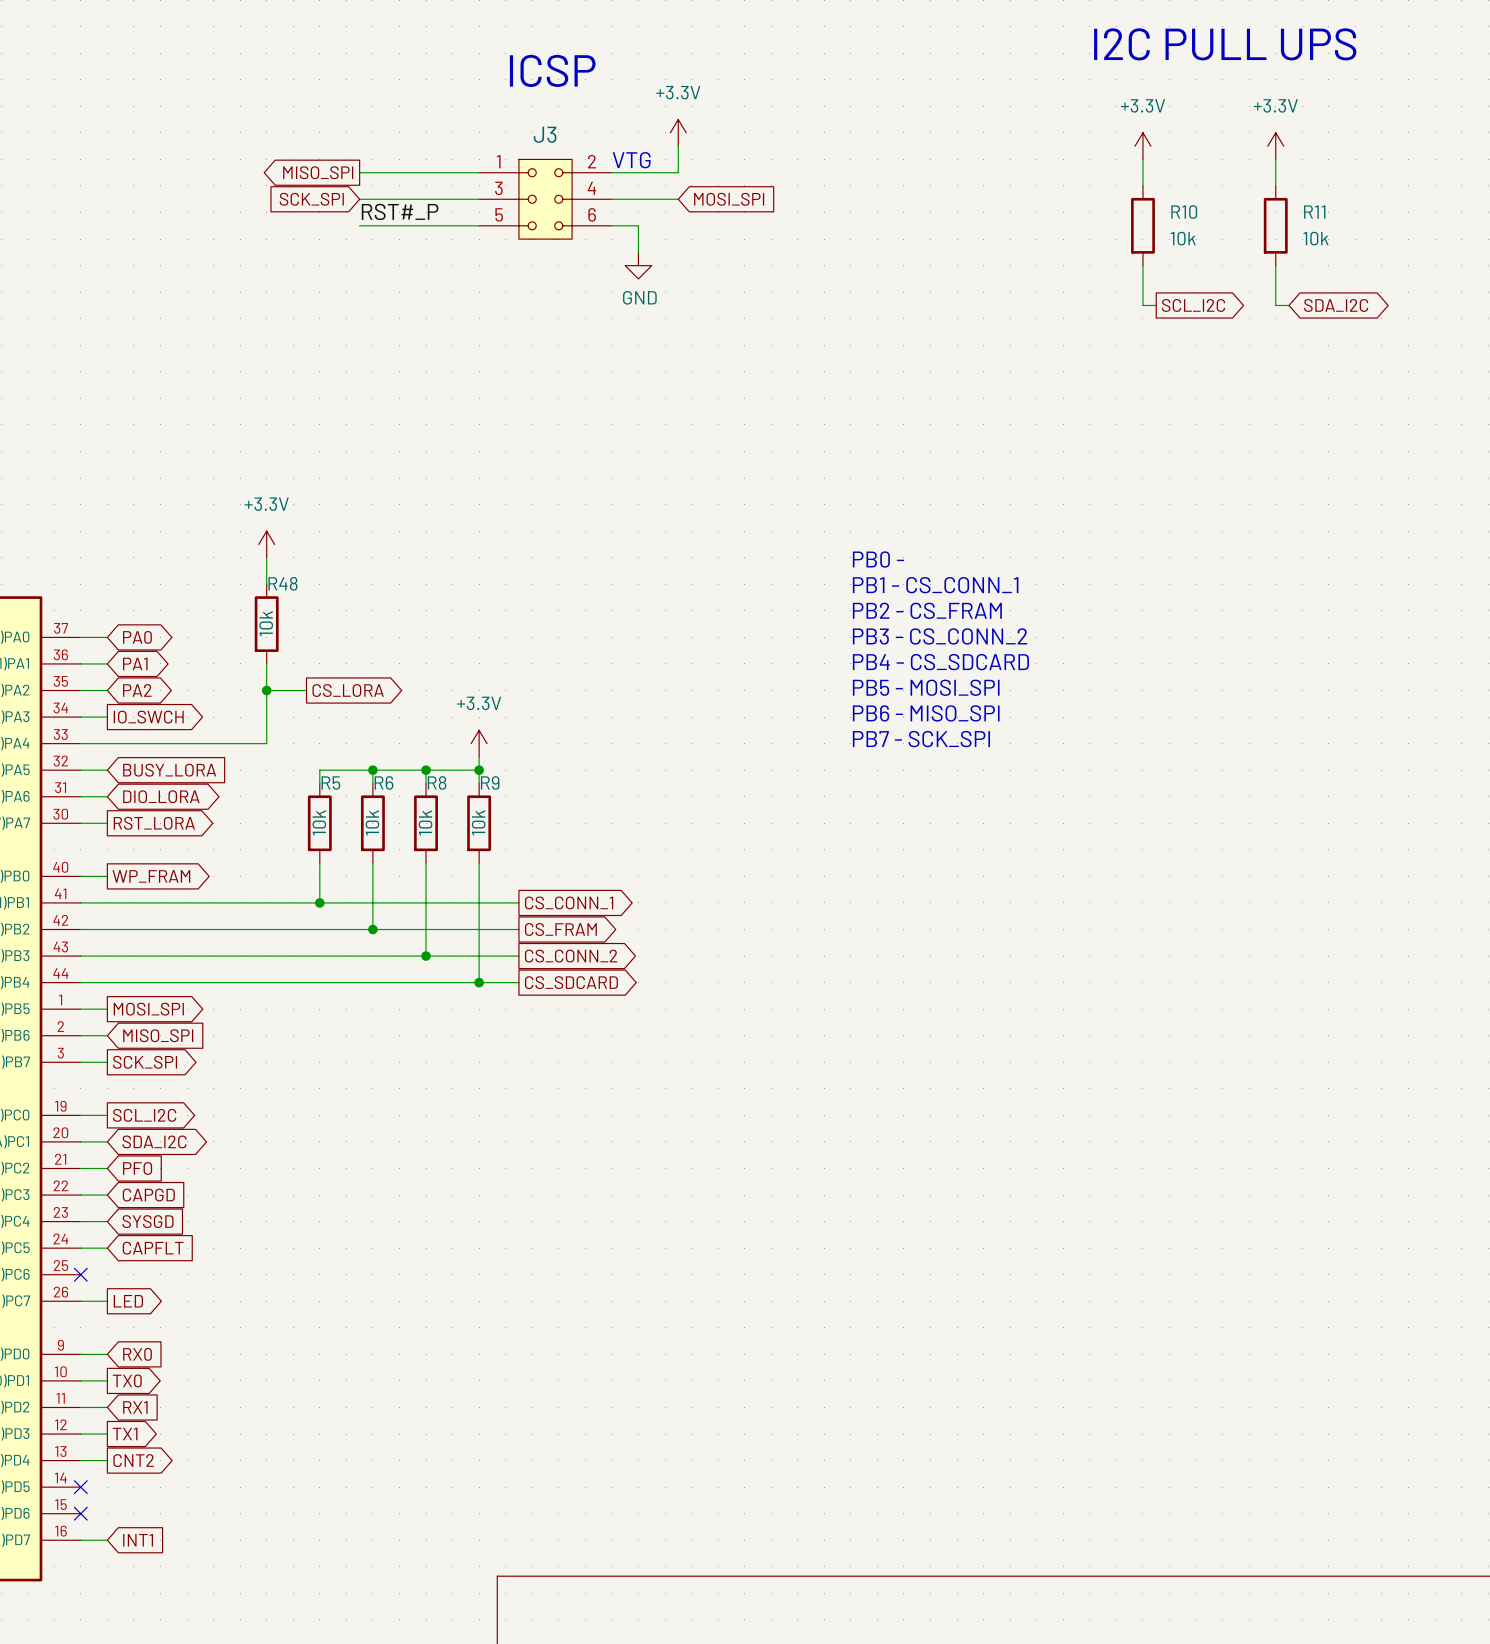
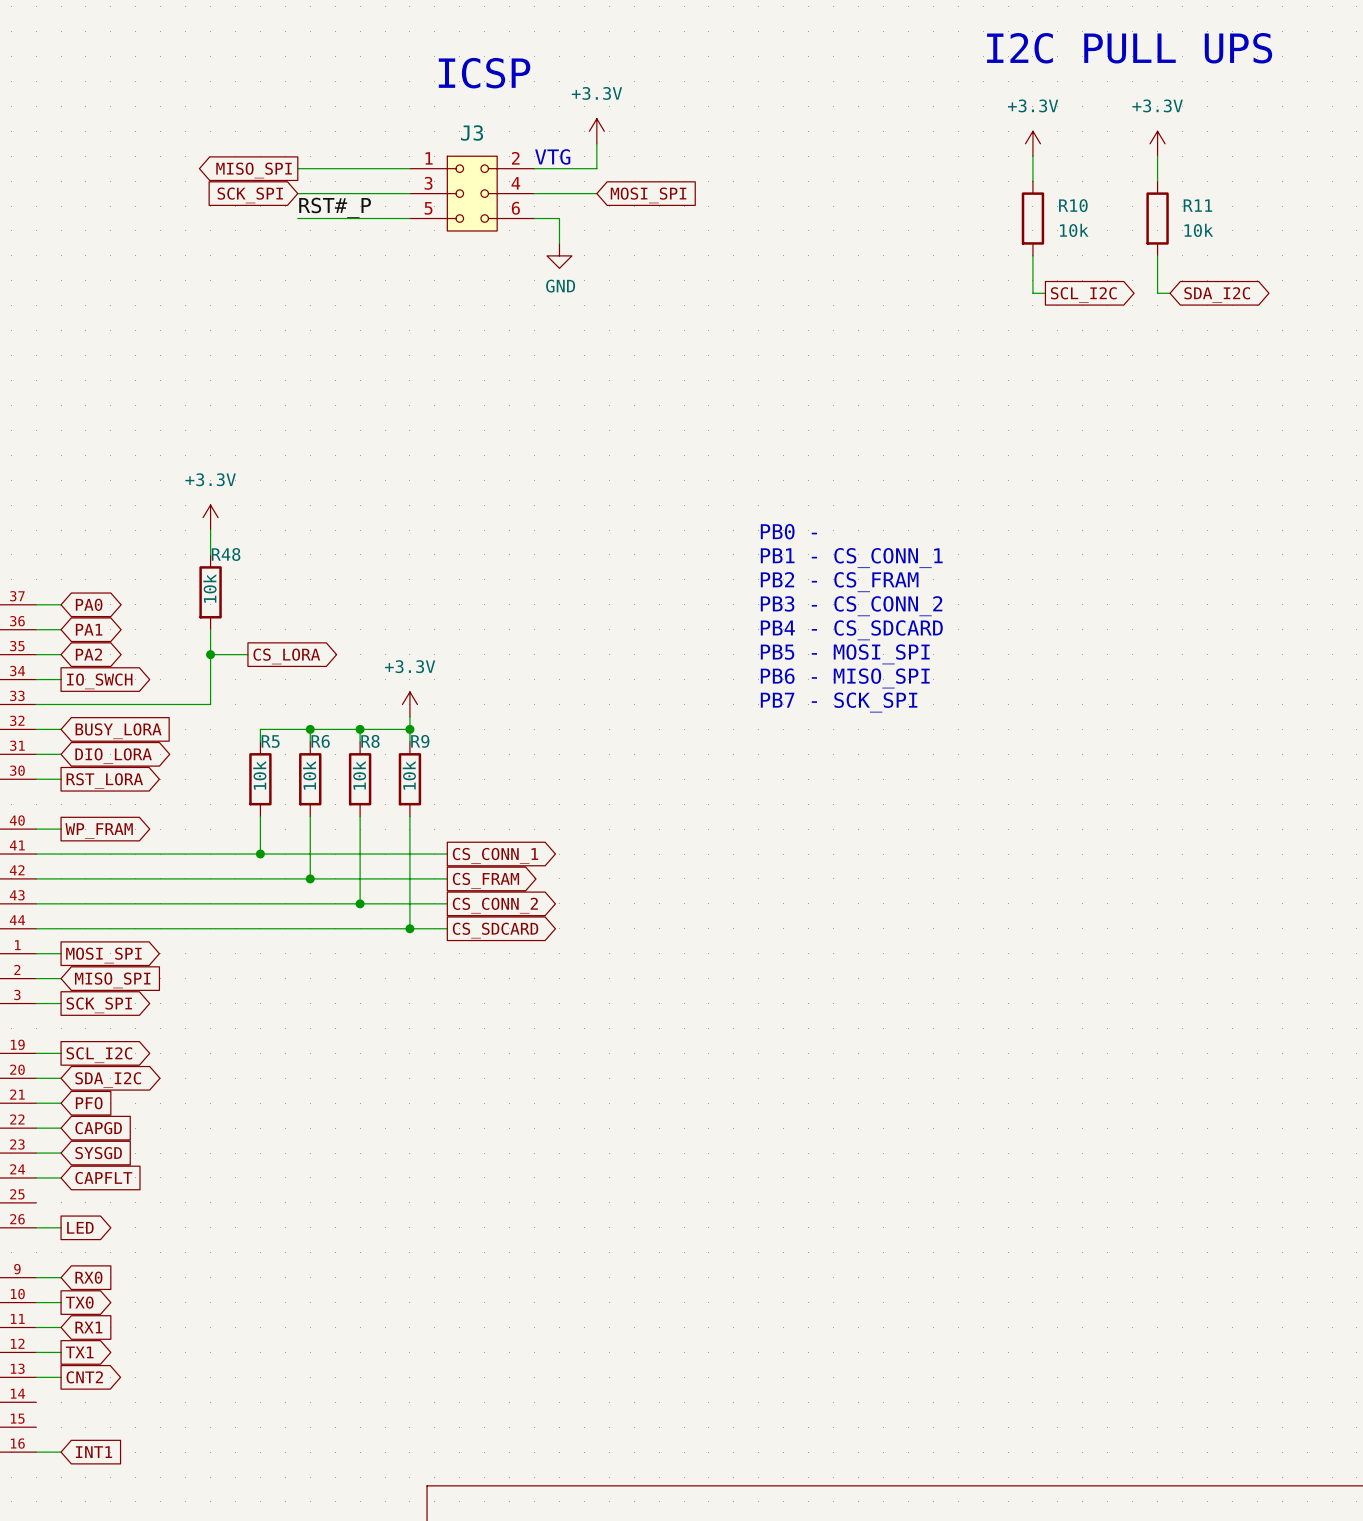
no-connect mark: (80, 1274) -> none
no-connect mark: (80, 1487) -> none
no-connect mark: (80, 1513) -> none

